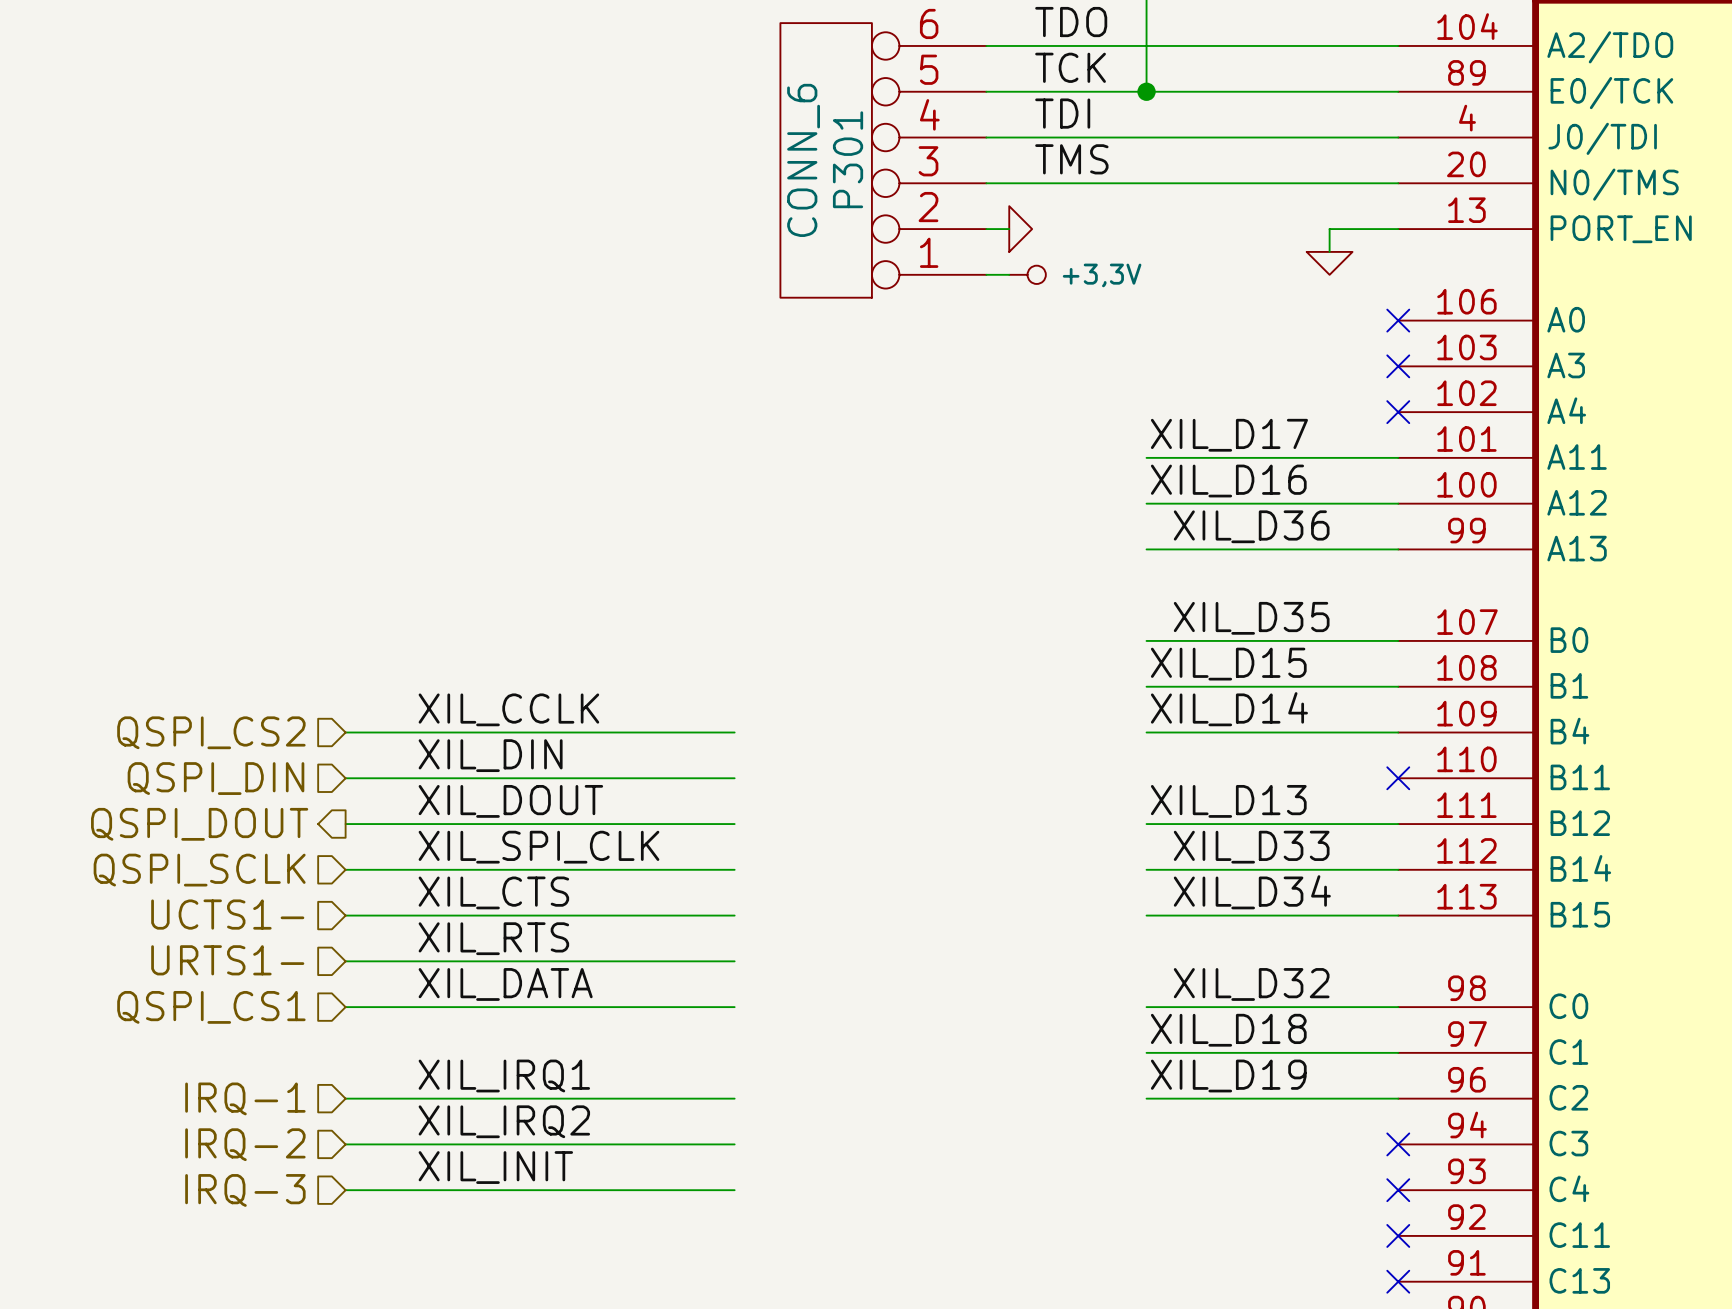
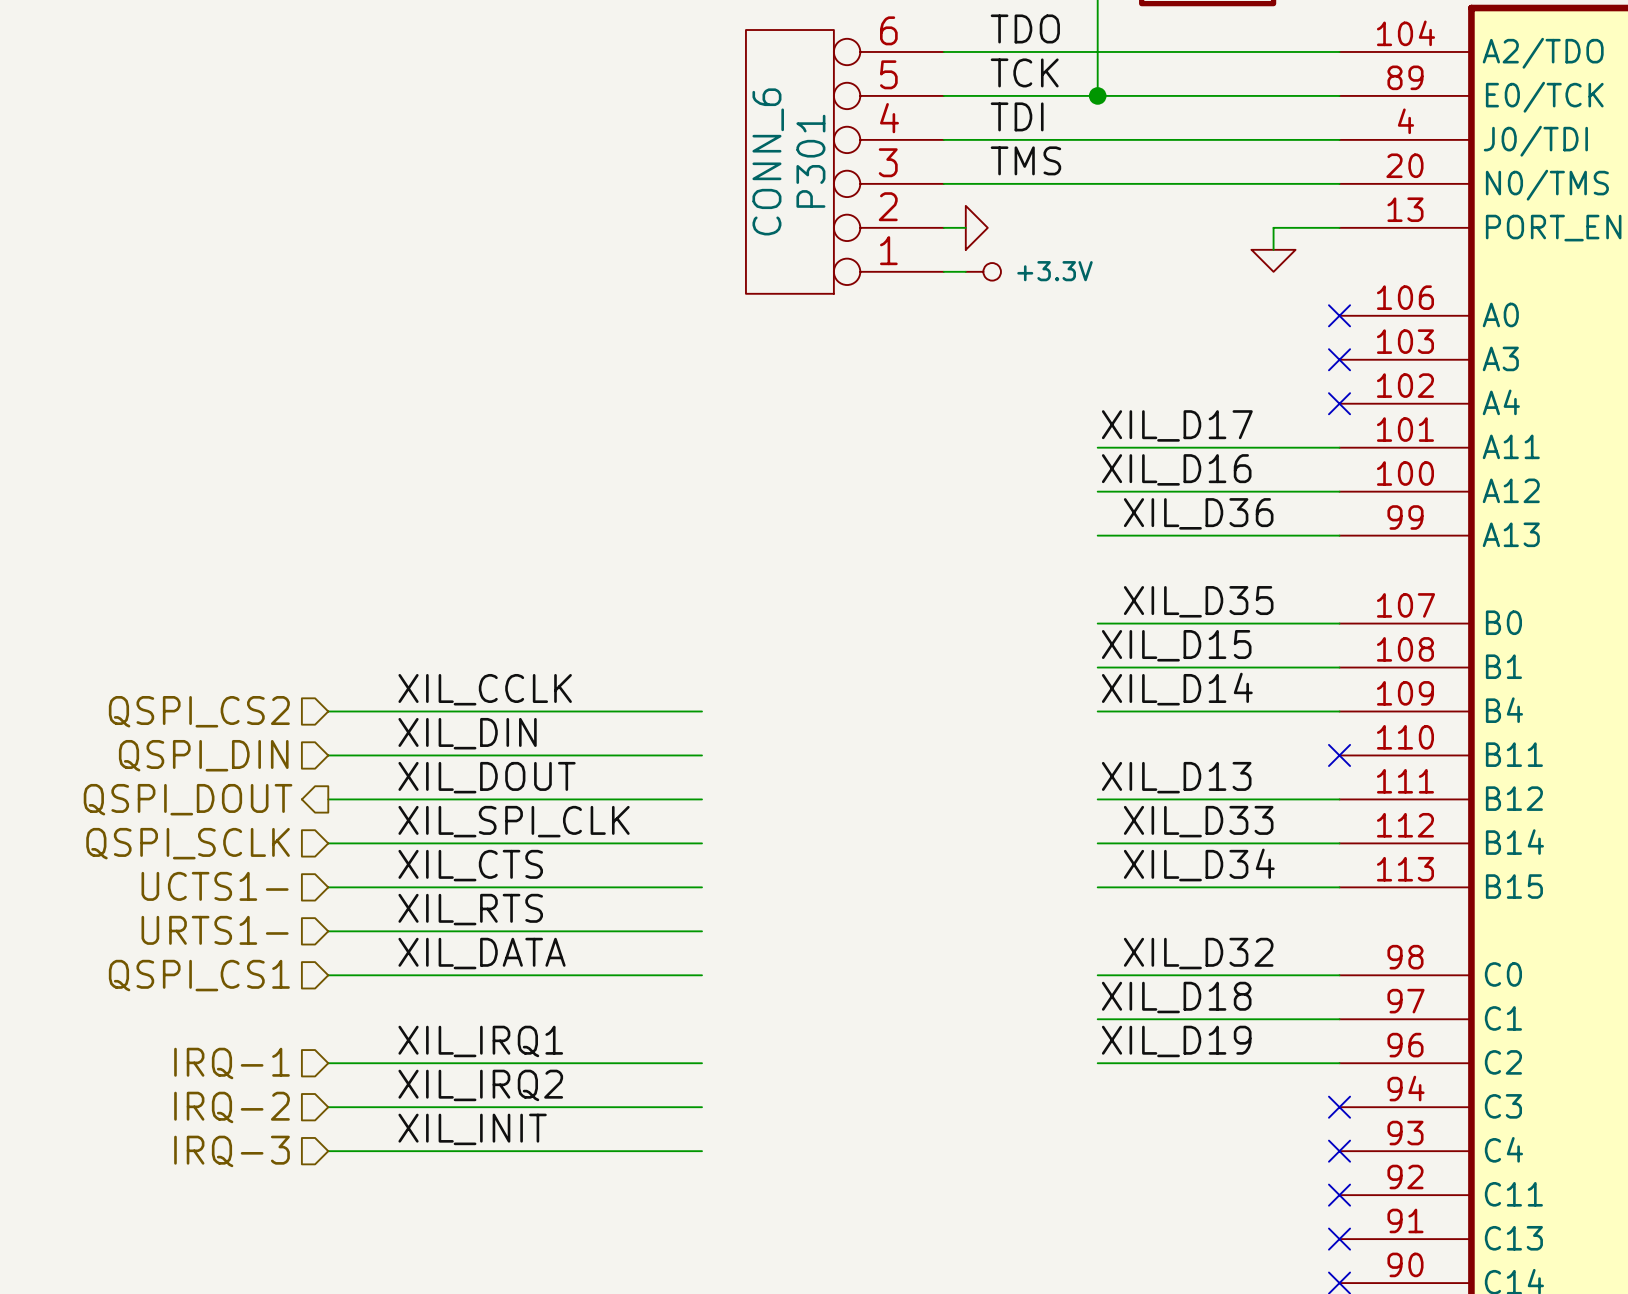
power symbol: +3,3V (1027, 274) -> +3.3V (983, 271)

